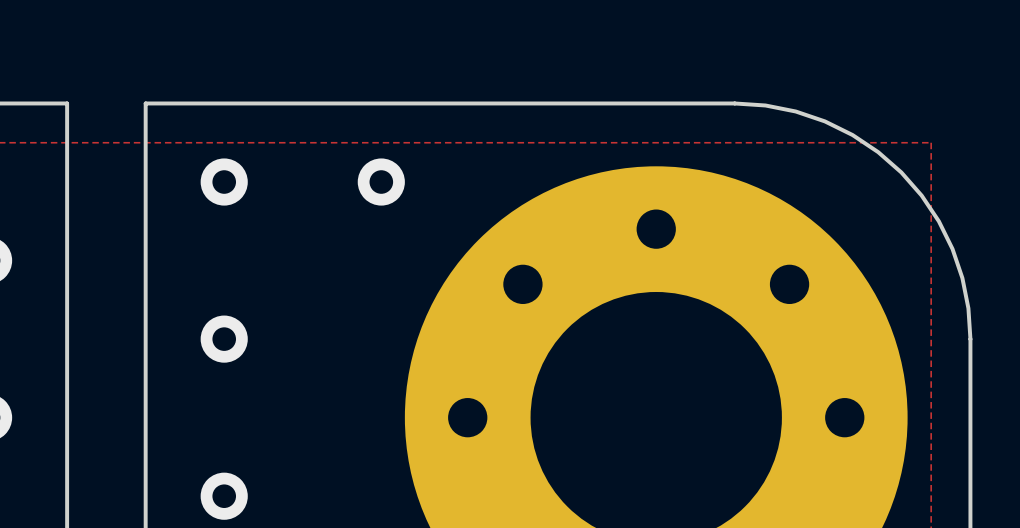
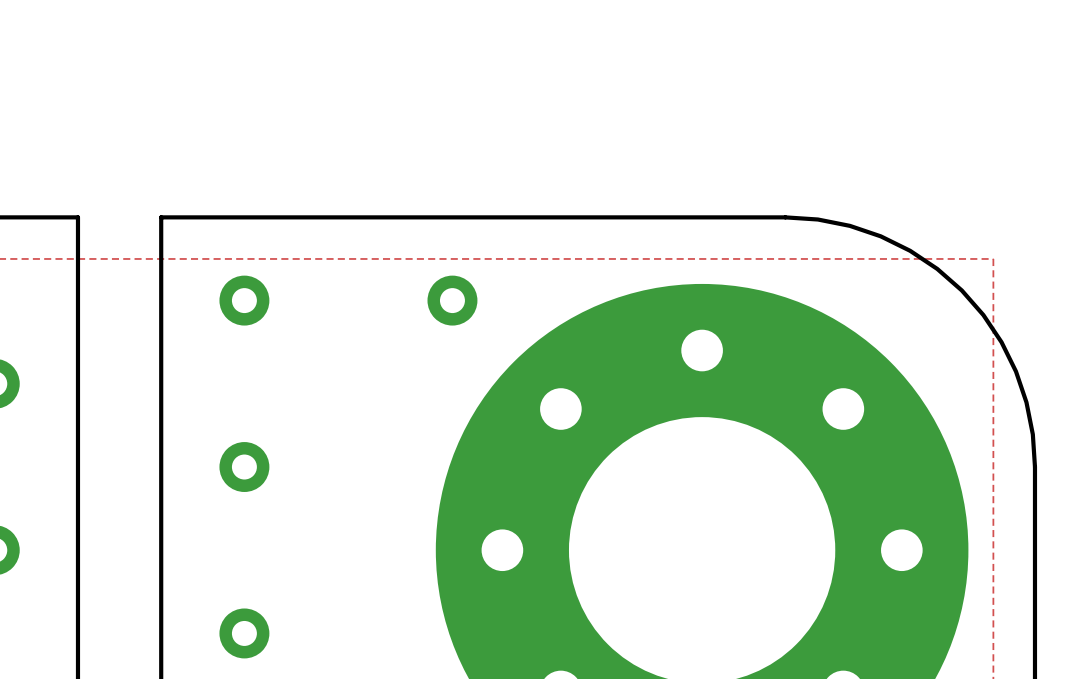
via position: (381, 182) -> (452, 300)

